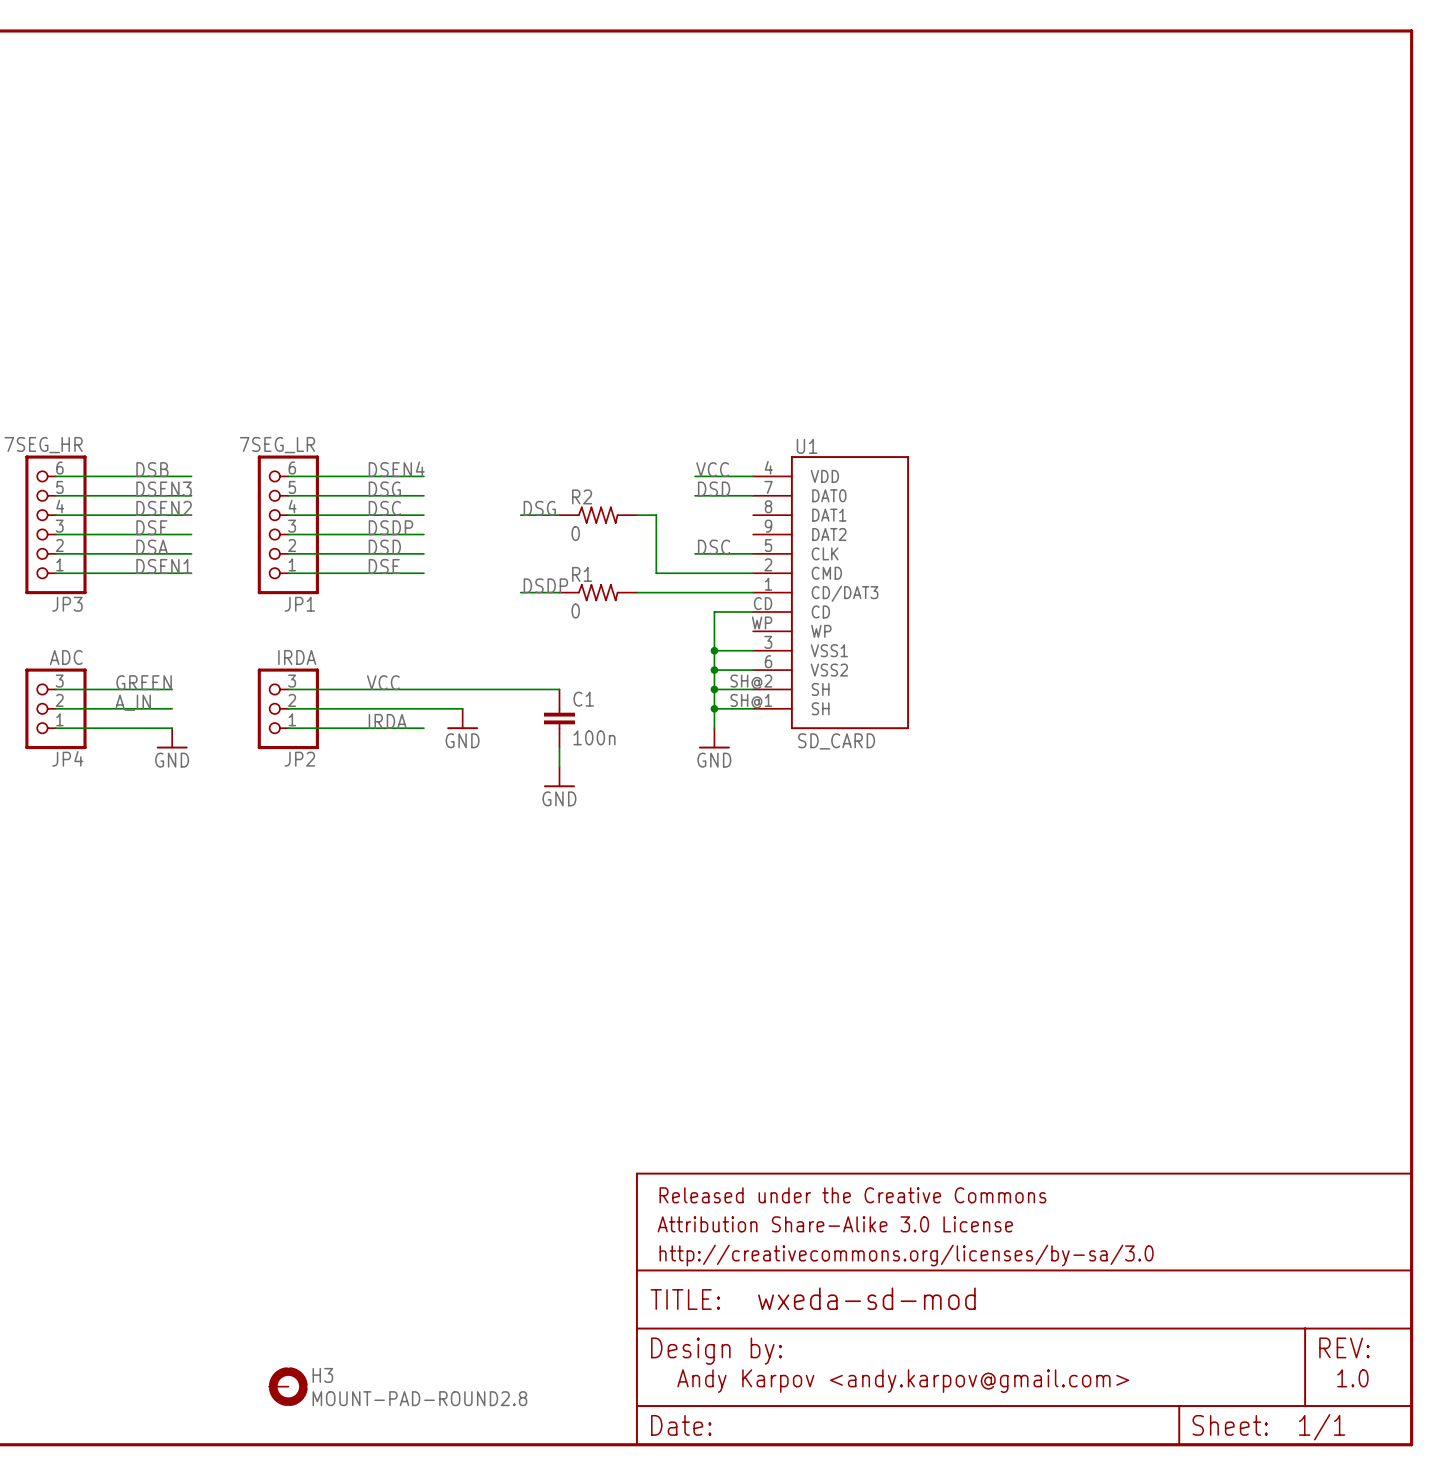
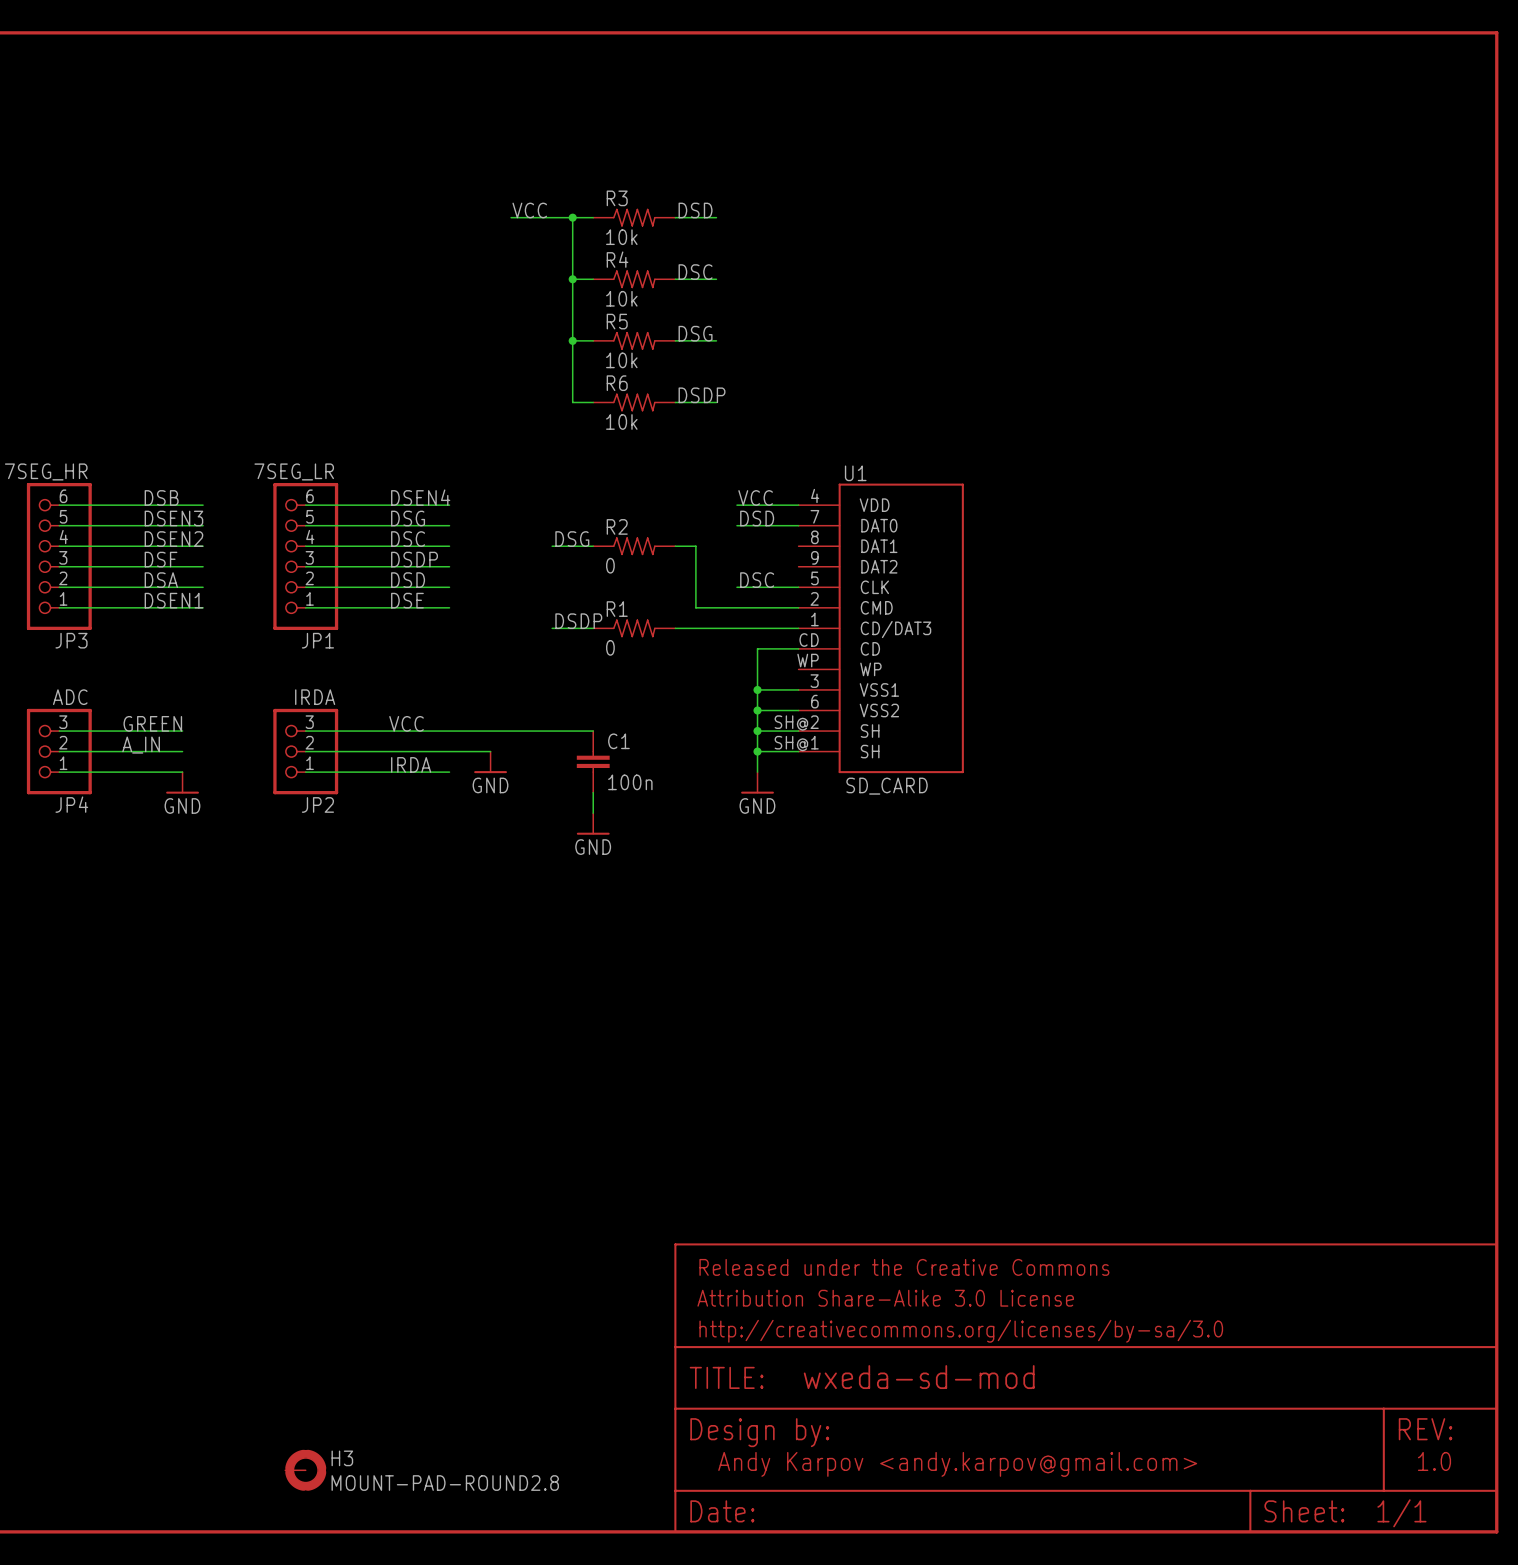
label: none -> VCC (529, 210)
label: none -> DSD (695, 210)
wire: none -> (511, 217) (593, 217)
wire: none -> (572, 217) (572, 402) (593, 402)
junction: none -> (572, 217)
R3: none -> 10k (634, 217)
wire: none -> (675, 217) (716, 217)
label: none -> DSC (695, 272)
wire: none -> (572, 279) (593, 279)
junction: none -> (572, 279)
R4: none -> 10k (634, 279)
wire: none -> (675, 279) (716, 279)
label: none -> DSG (695, 333)
wire: none -> (572, 340) (593, 340)
junction: none -> (572, 340)
R5: none -> 10k (634, 340)
wire: none -> (675, 340) (716, 340)
label: none -> DSDP (702, 395)
R6: none -> 10k (634, 402)
wire: none -> (675, 402) (716, 402)

